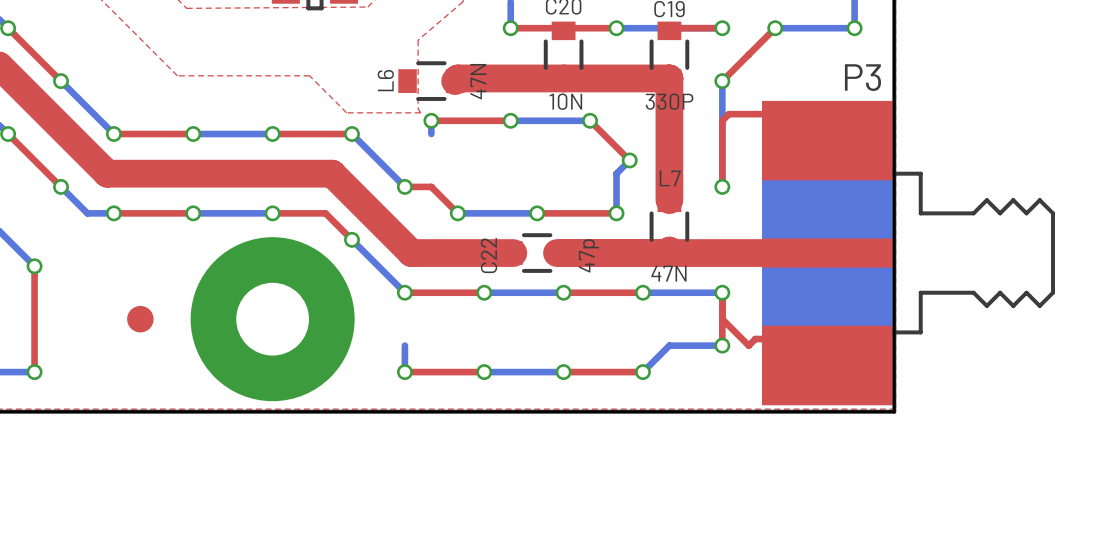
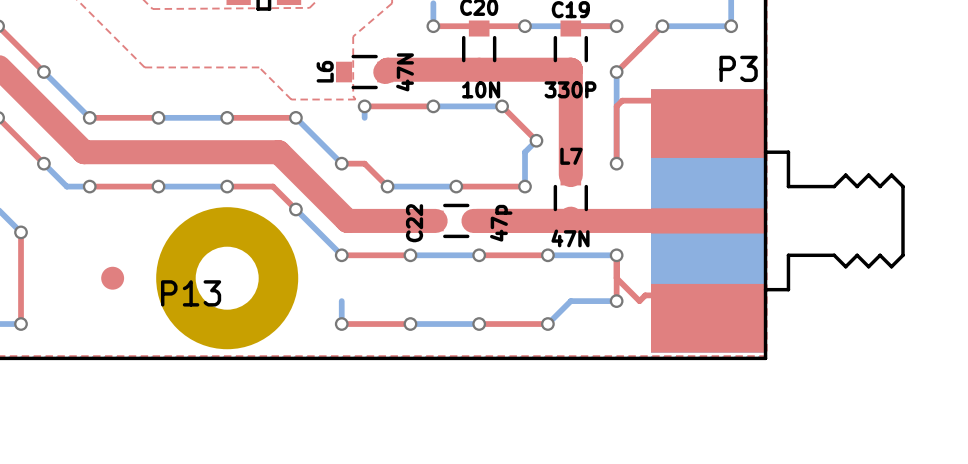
P13 name: none -> P13 (191, 293)

